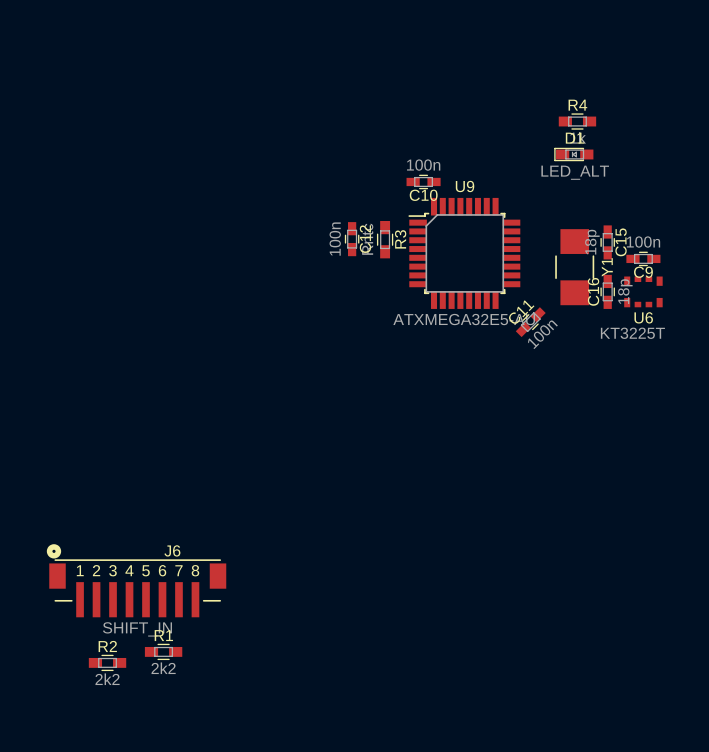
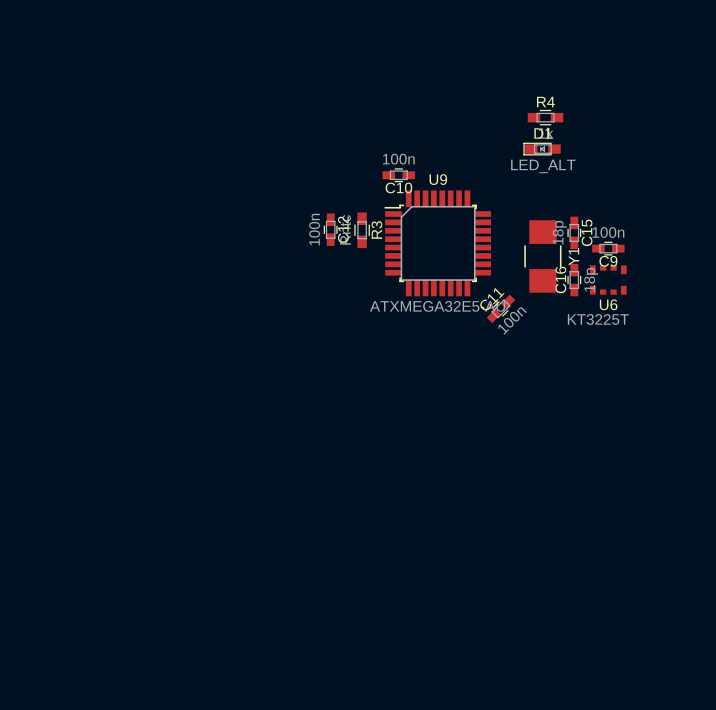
J6: SHIFT_IN (136, 580) -> none
R1: 2k2 (163, 651) -> none
R2: 2k2 (107, 662) -> none

